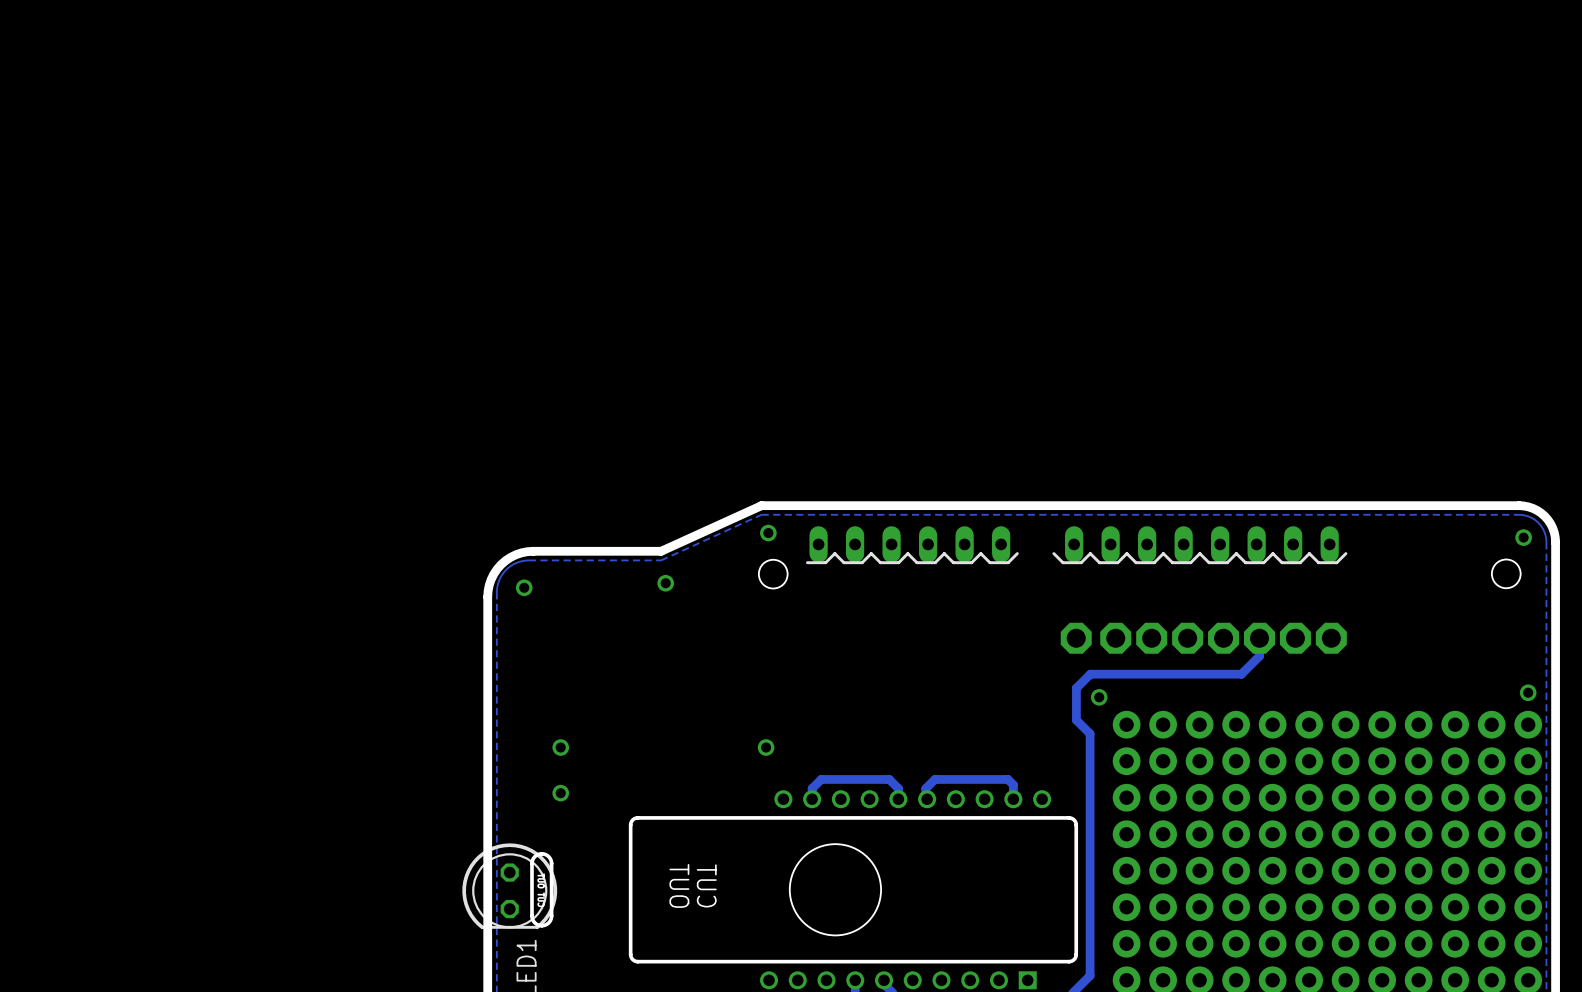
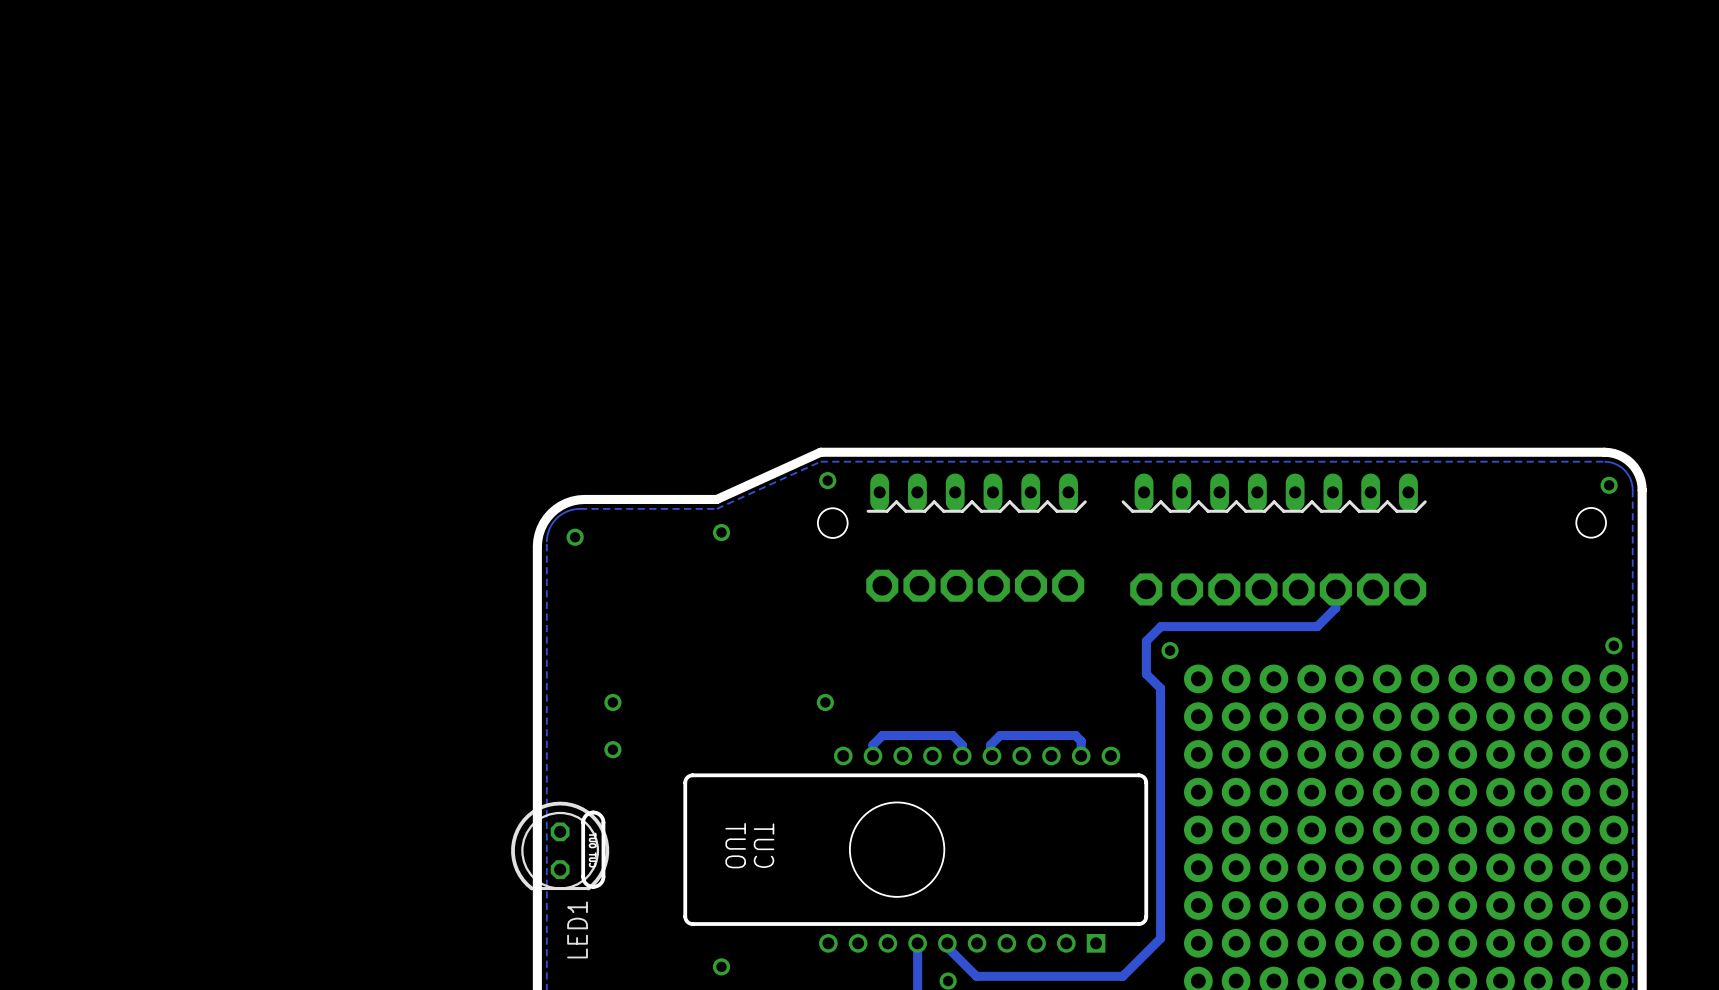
part: none -> (882, 585)
part: none -> (919, 585)
part: none -> (956, 585)
part: none -> (993, 585)
part: none -> (1030, 585)
part: none -> (1068, 585)

